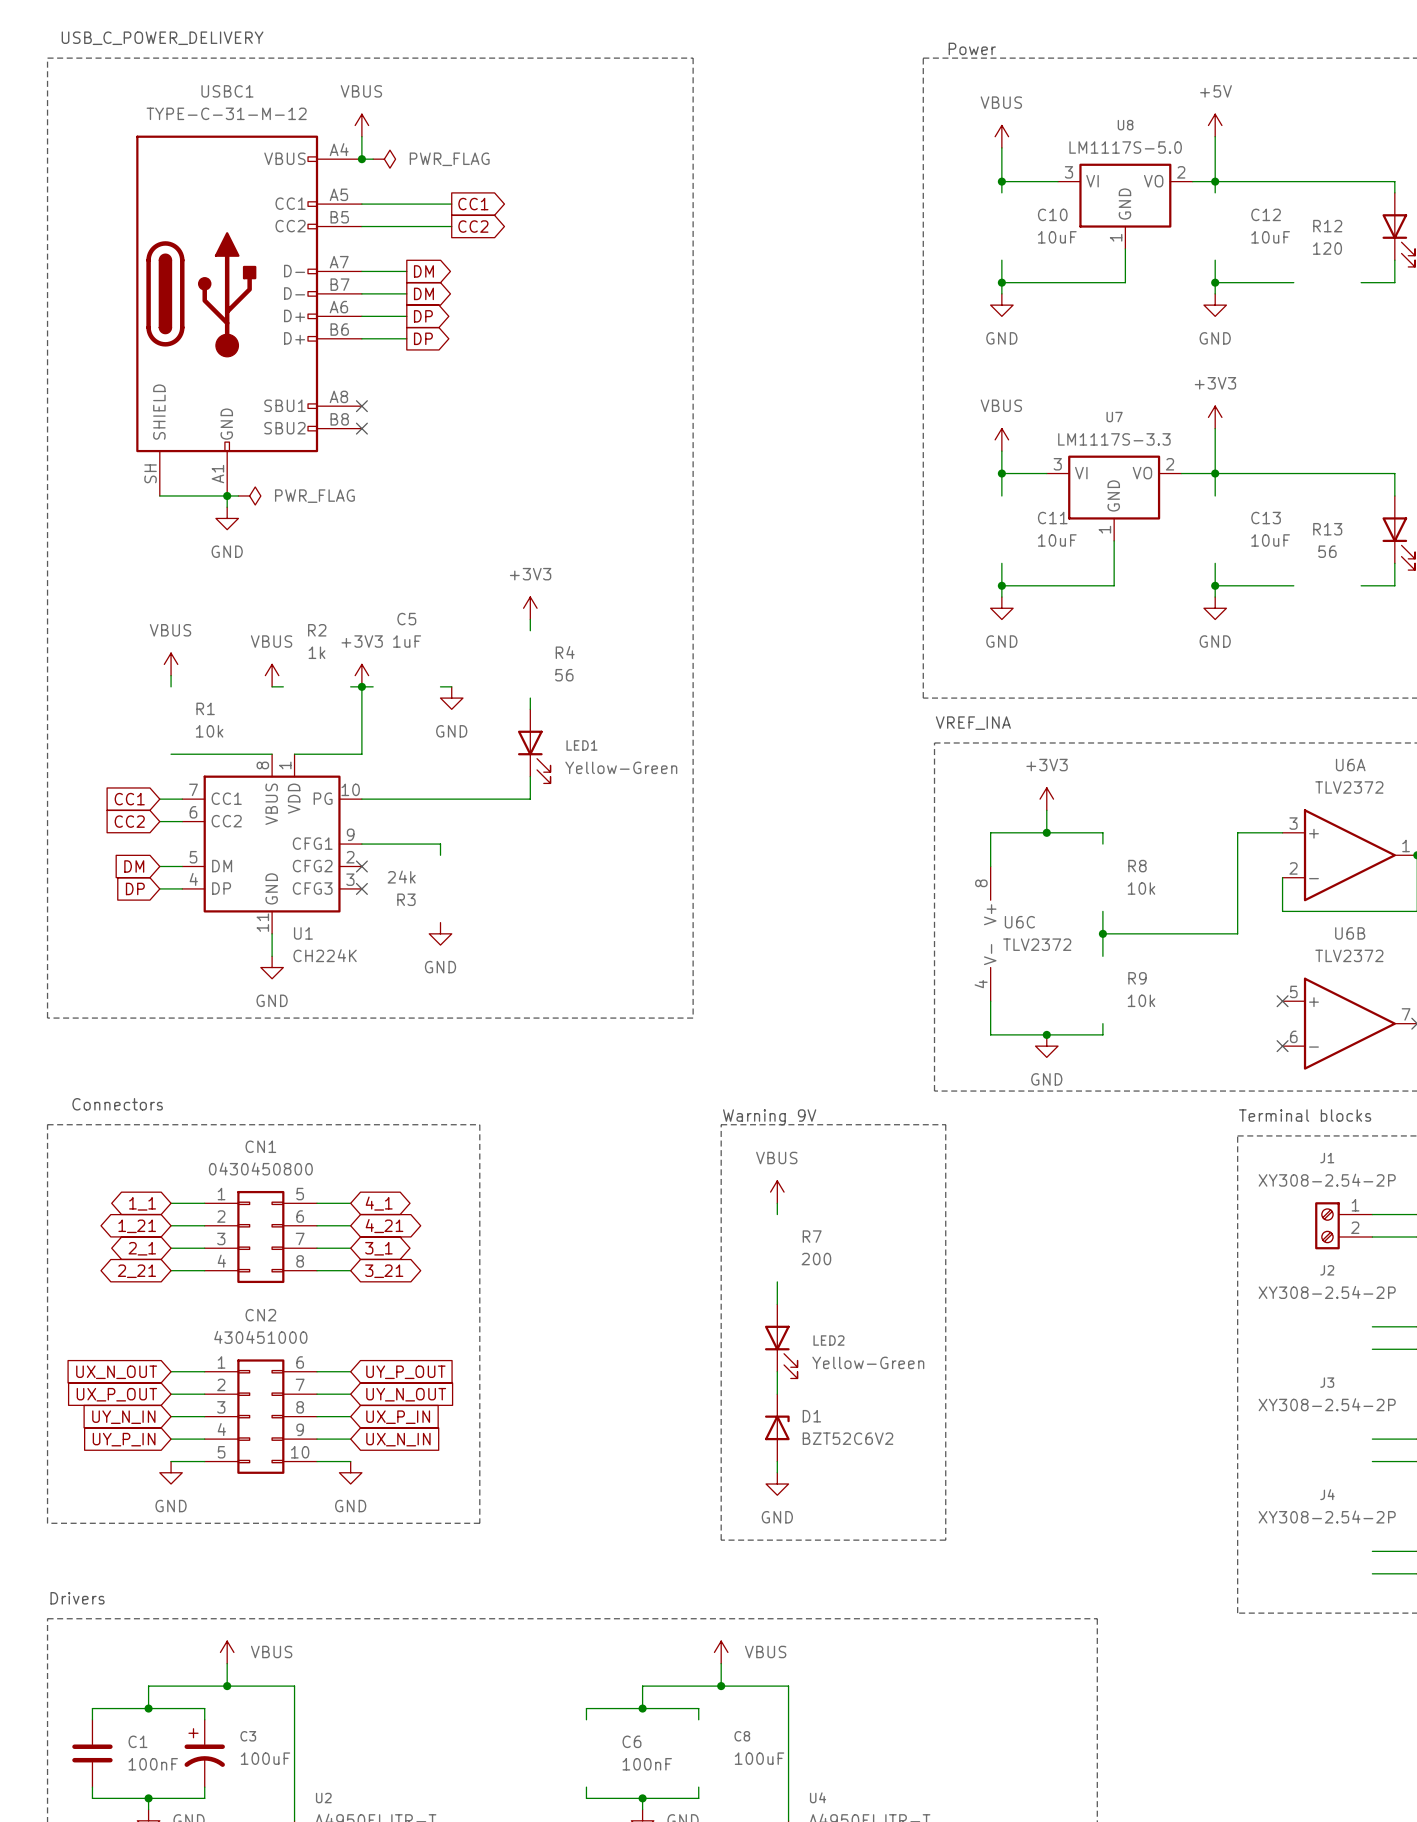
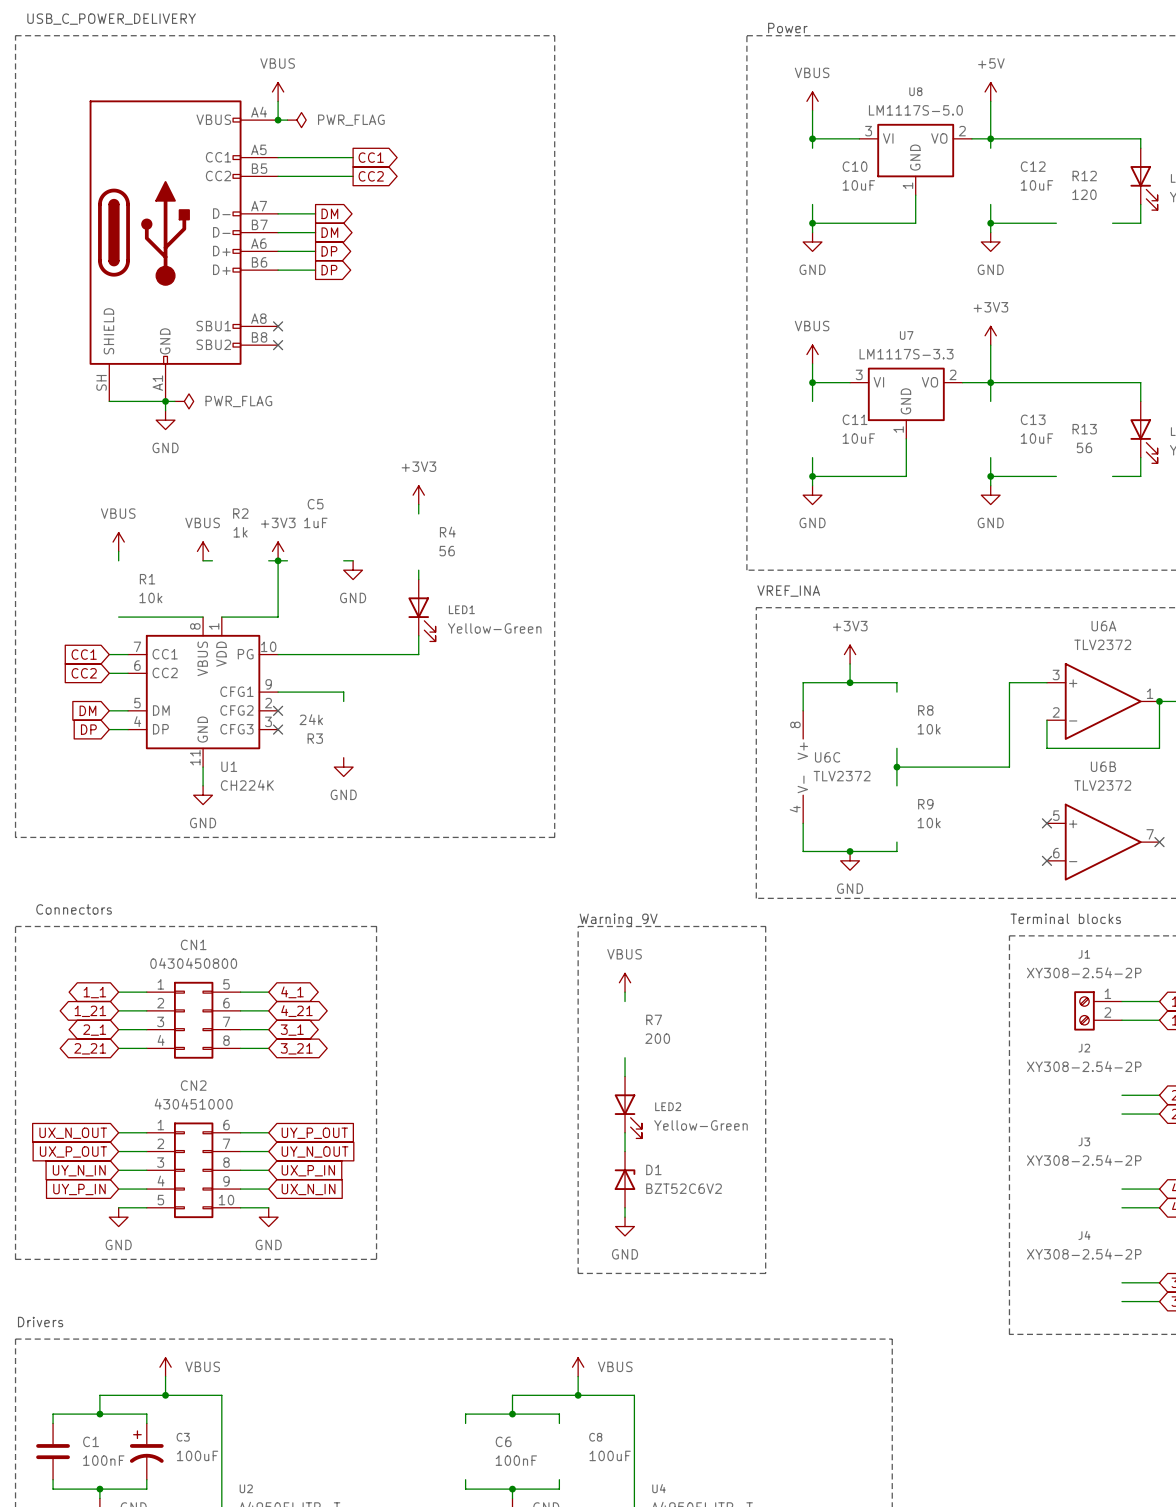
USBC1 name: USBC1 (227, 91) -> none
USBC1 value: TYPE-C-31-M-12 (226, 113) -> none

